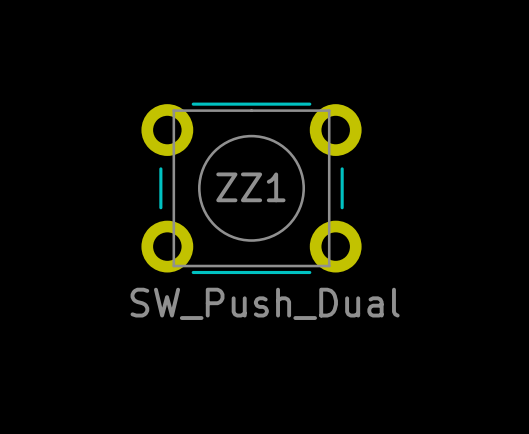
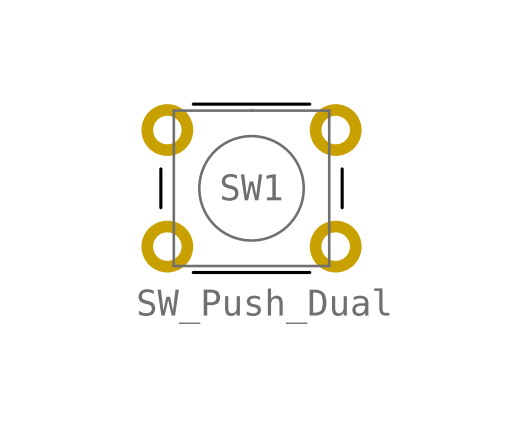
ZZ1 name: ZZ1 (250, 187) -> SW1 (251, 187)

